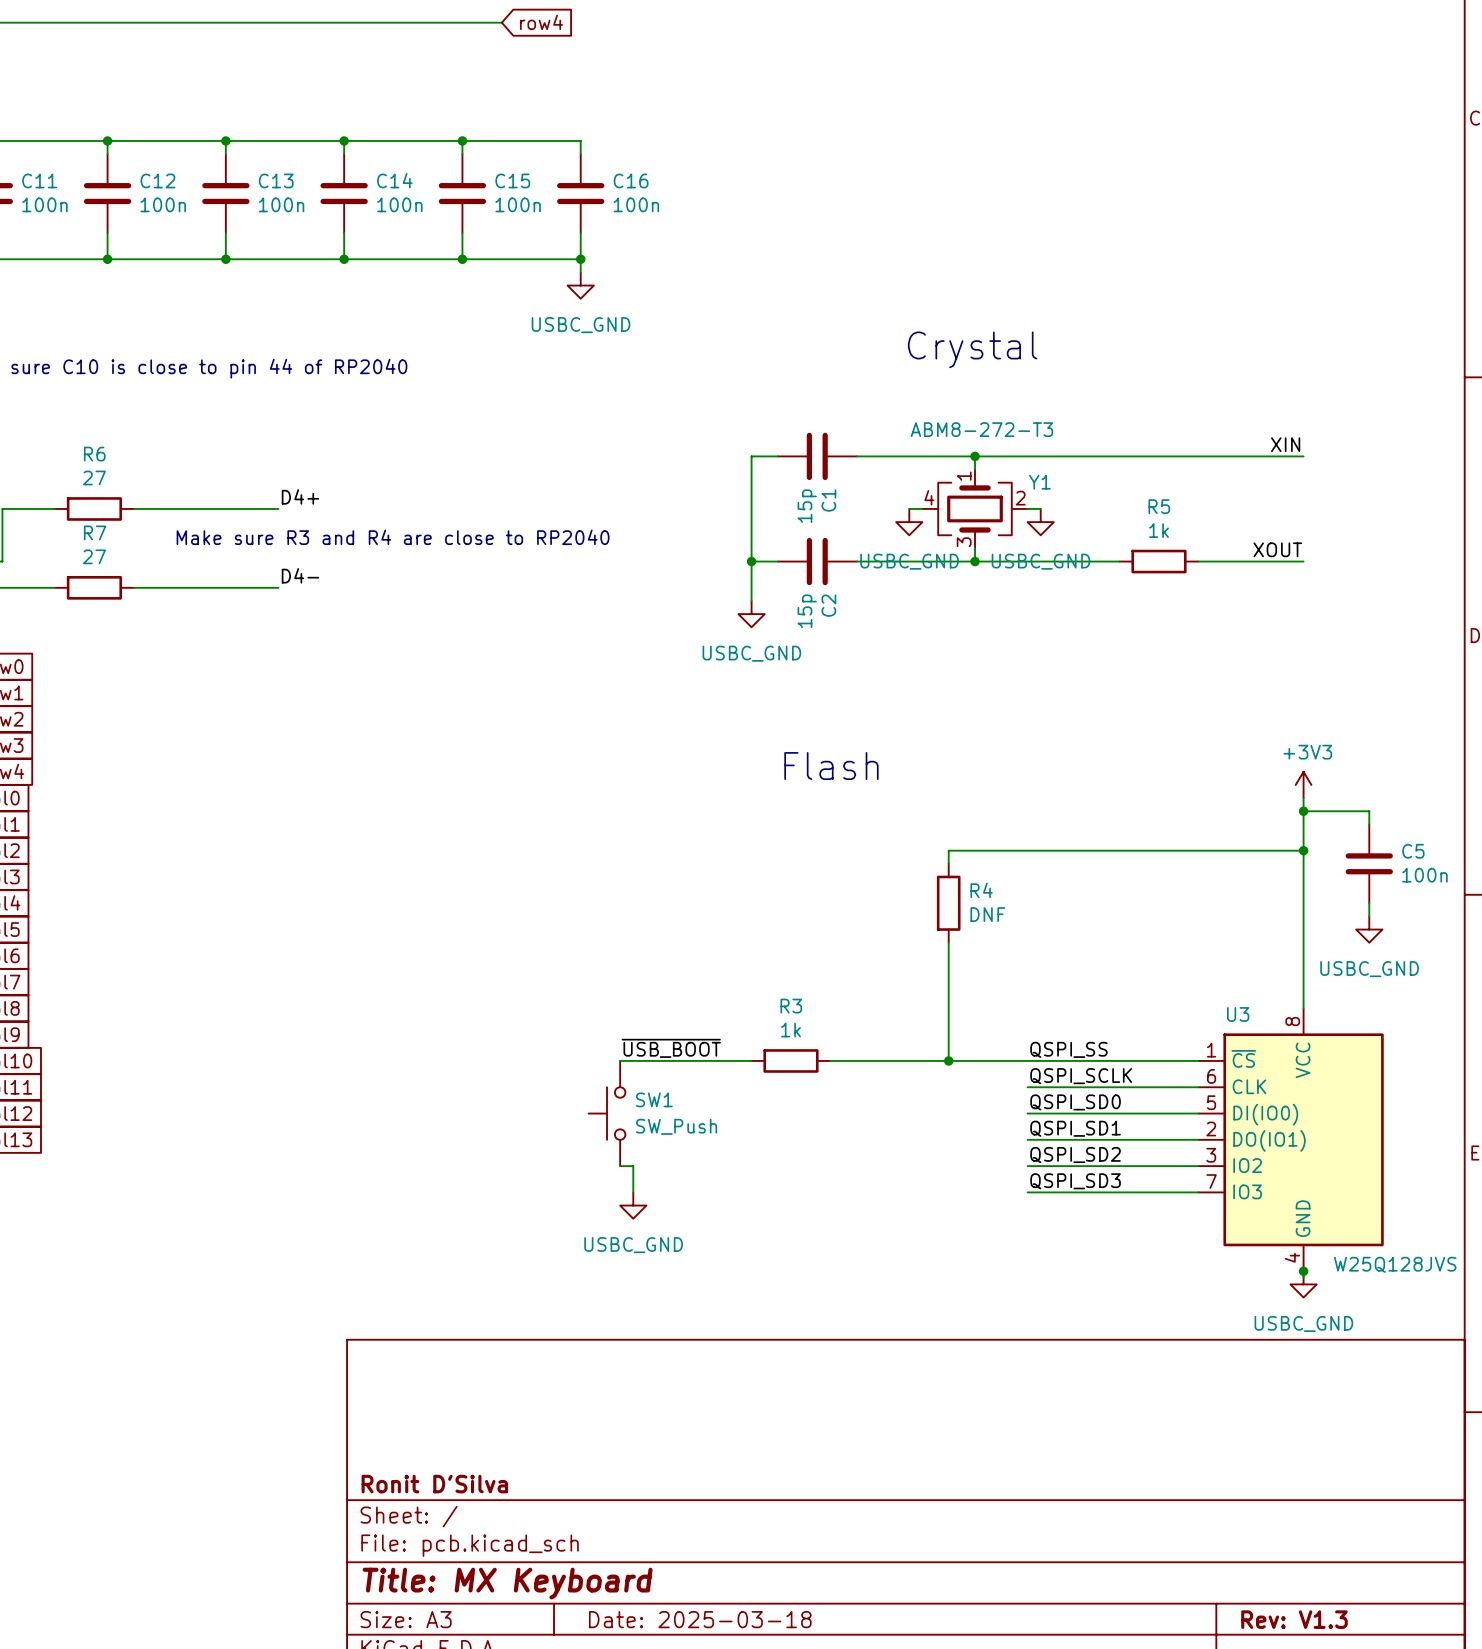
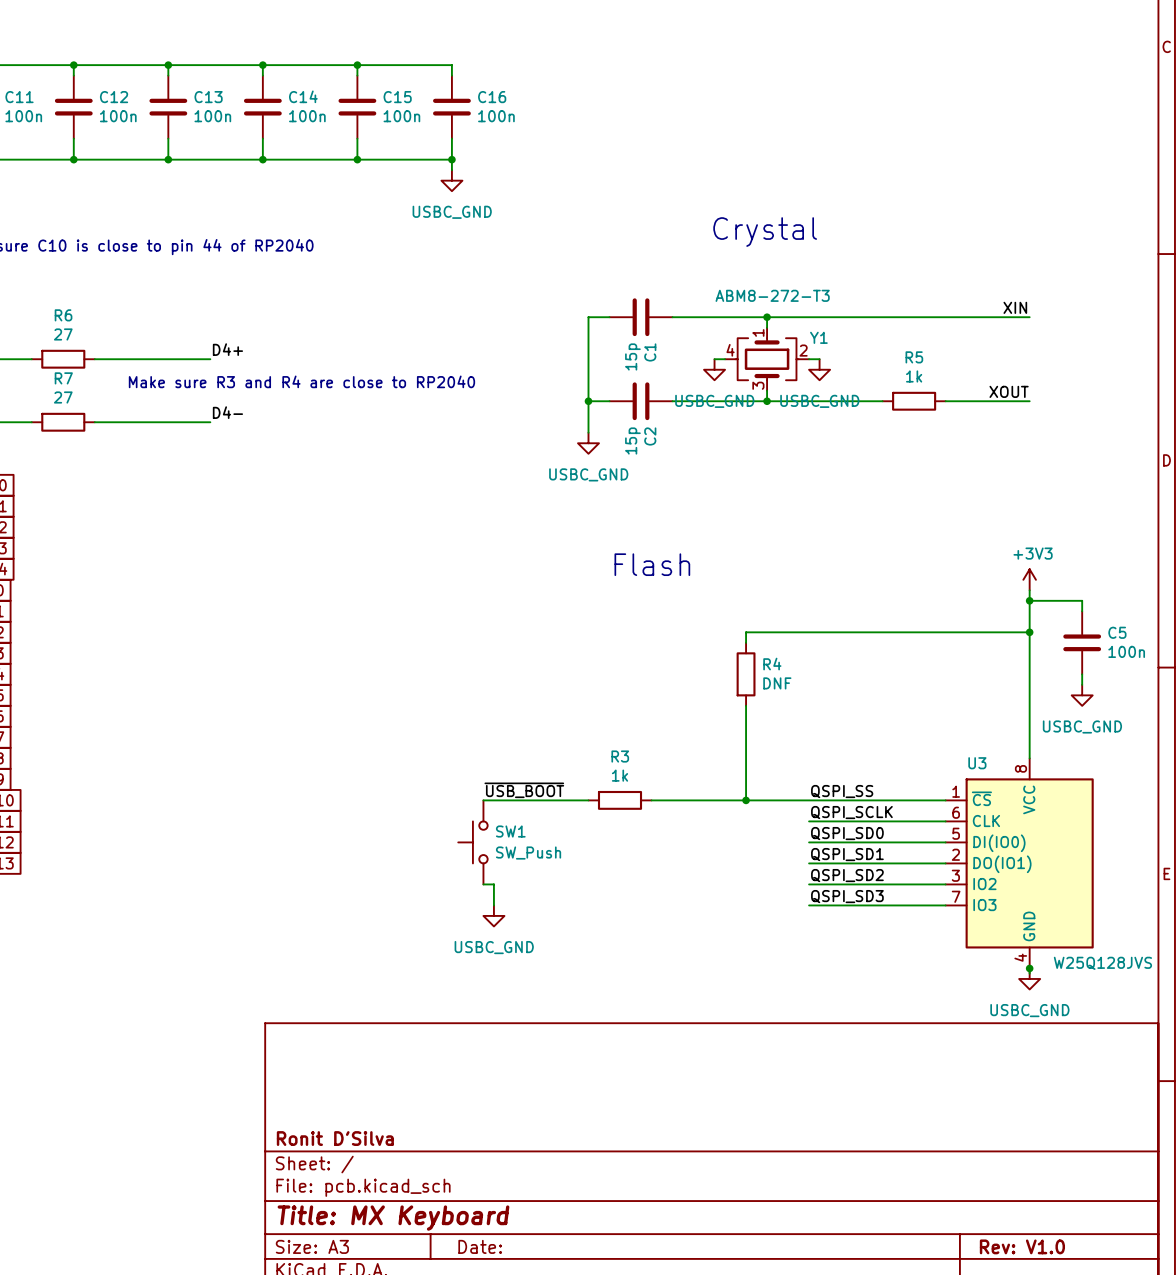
title block: Date: 2025-03-18 (700, 1619) -> Date: (480, 1246)
title block: Rev: V1.3 (1294, 1619) -> Rev: V1.0 (1022, 1246)

